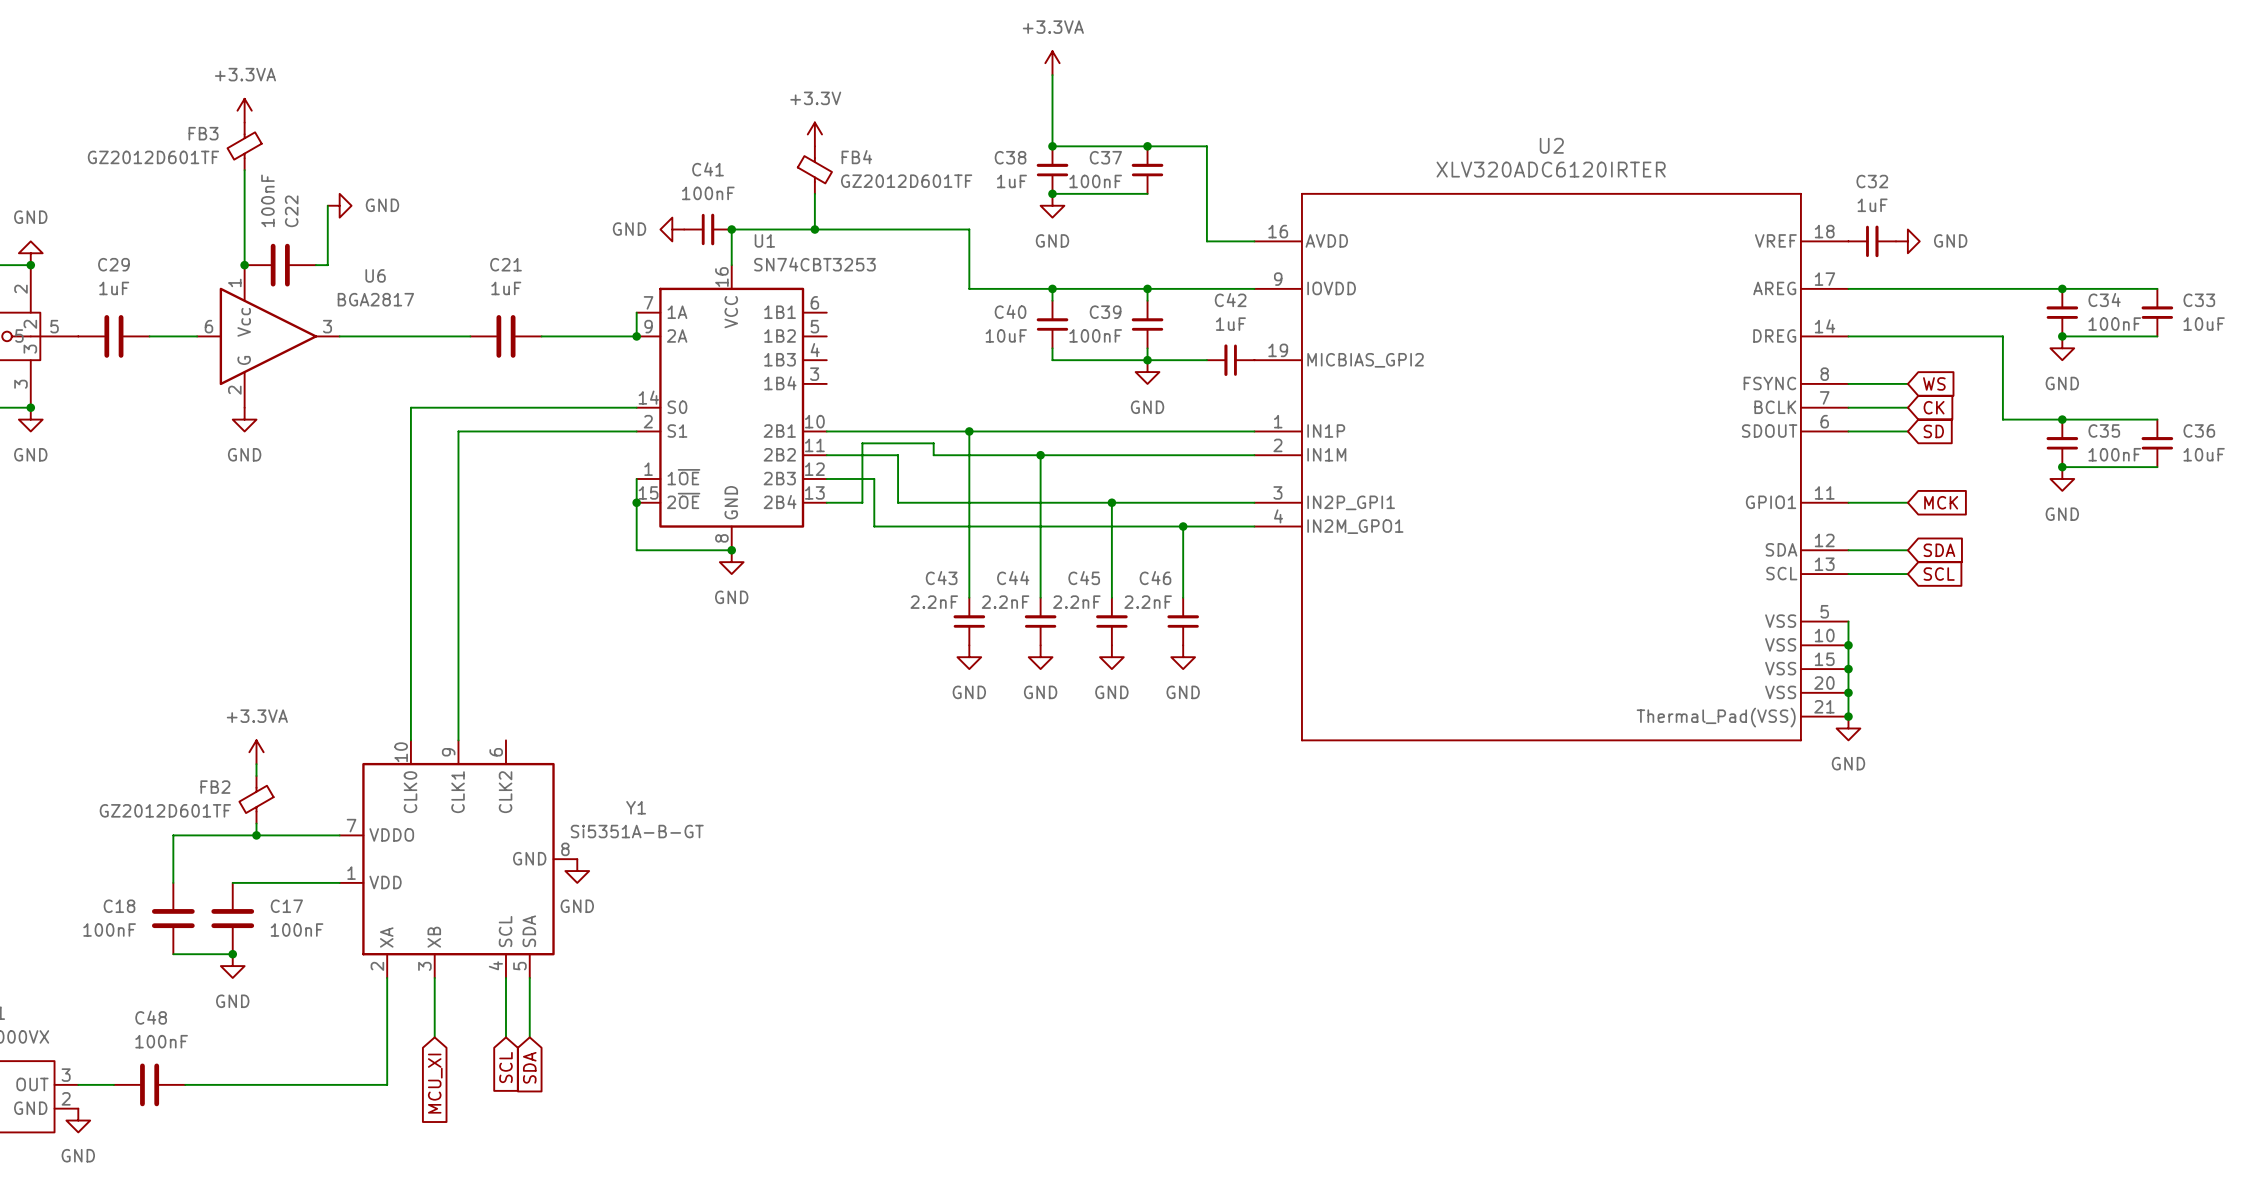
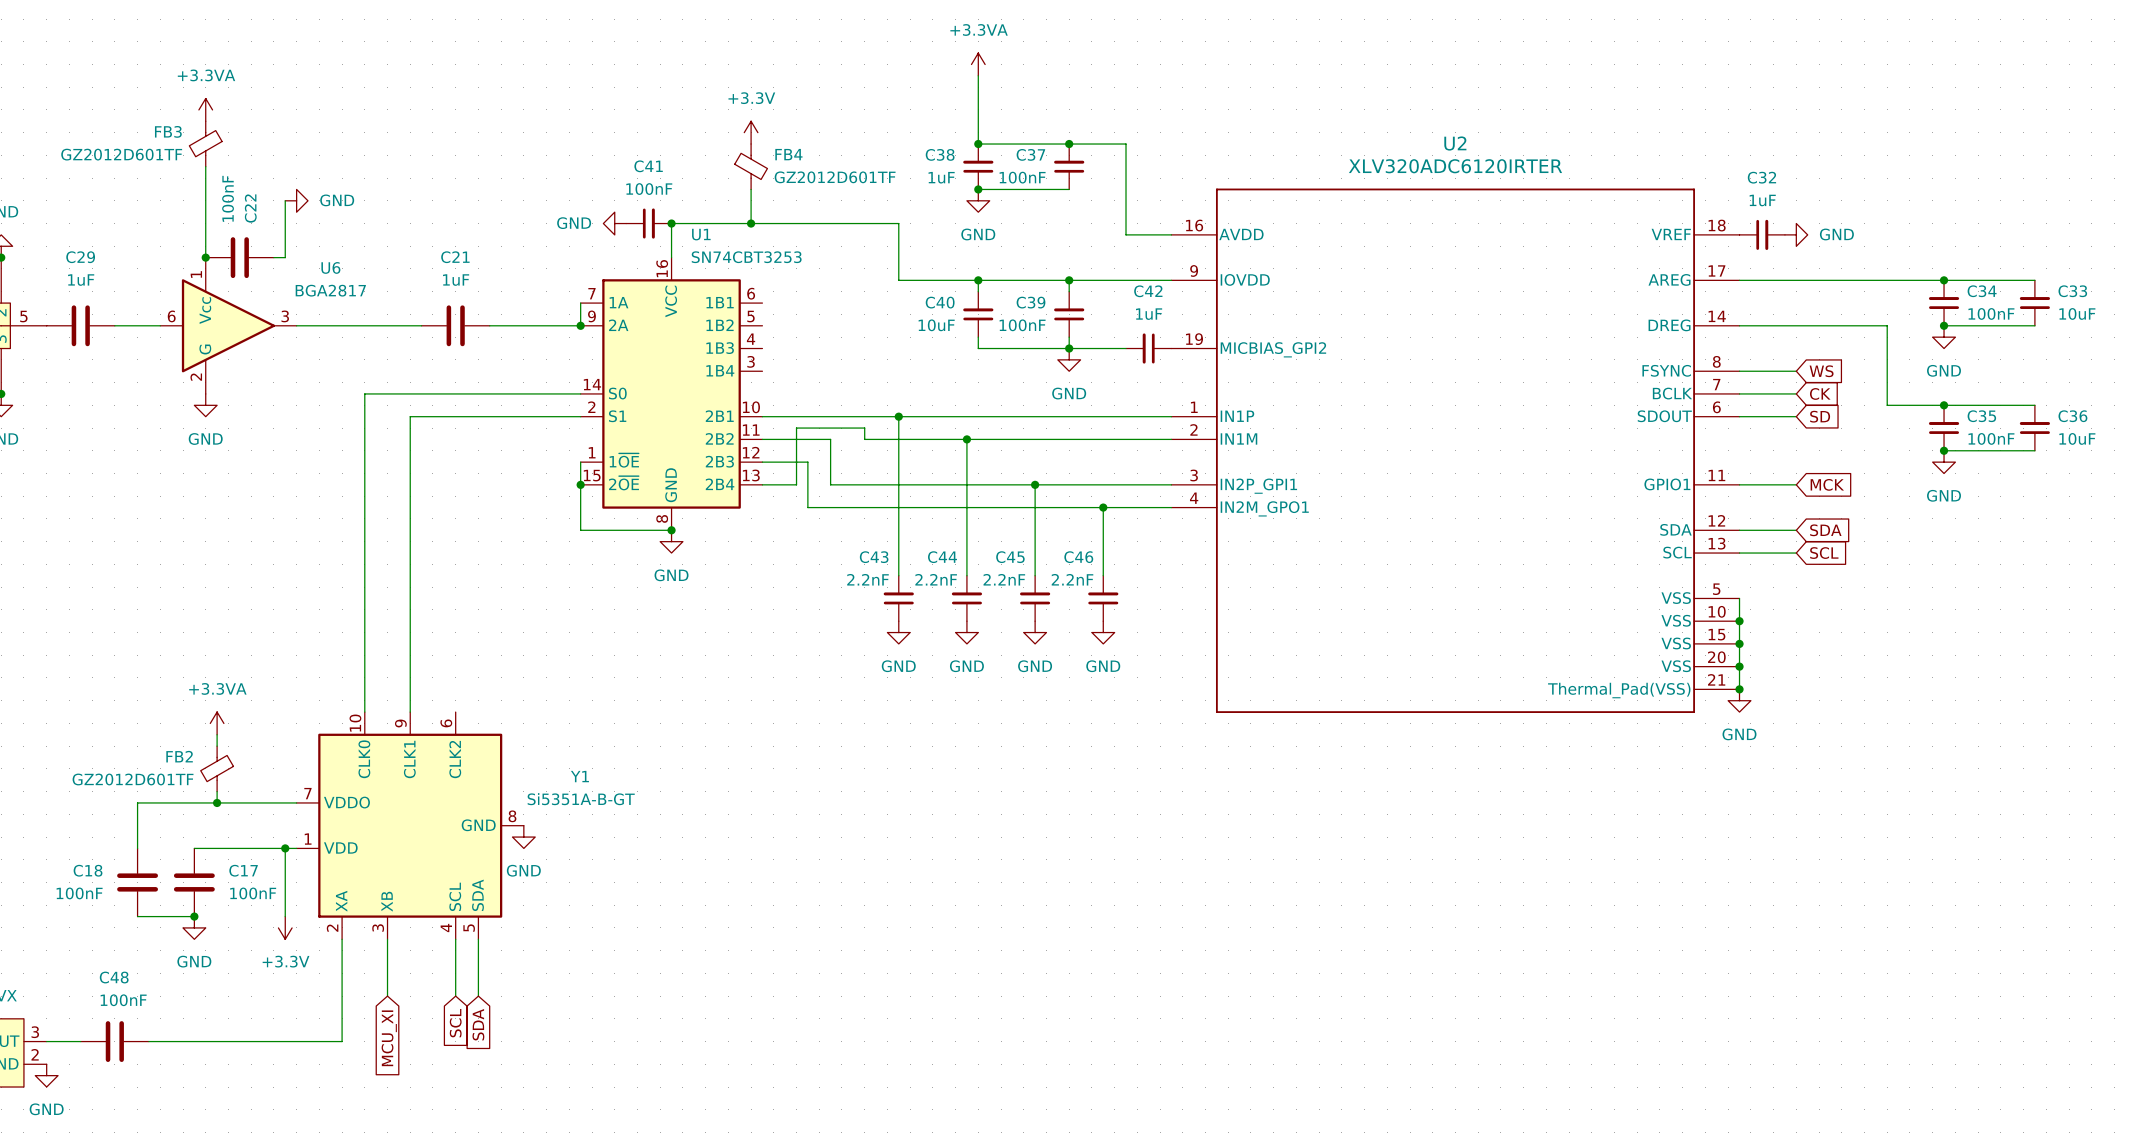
wire: none -> (285, 848) (285, 916)
junction: none -> (285, 848)
power symbol: none -> +3.3V (285, 927)

